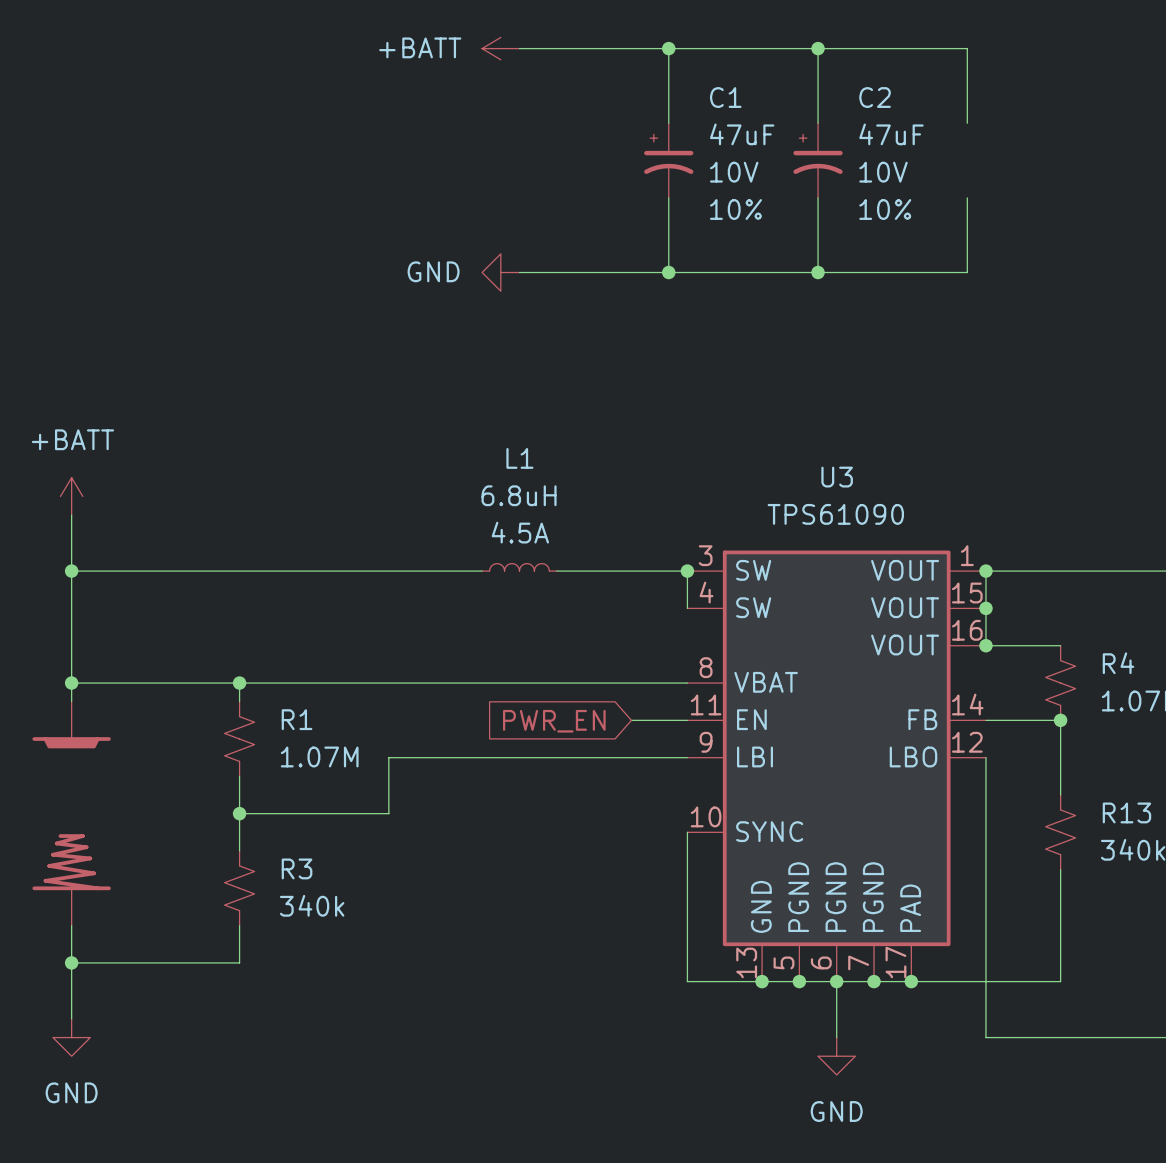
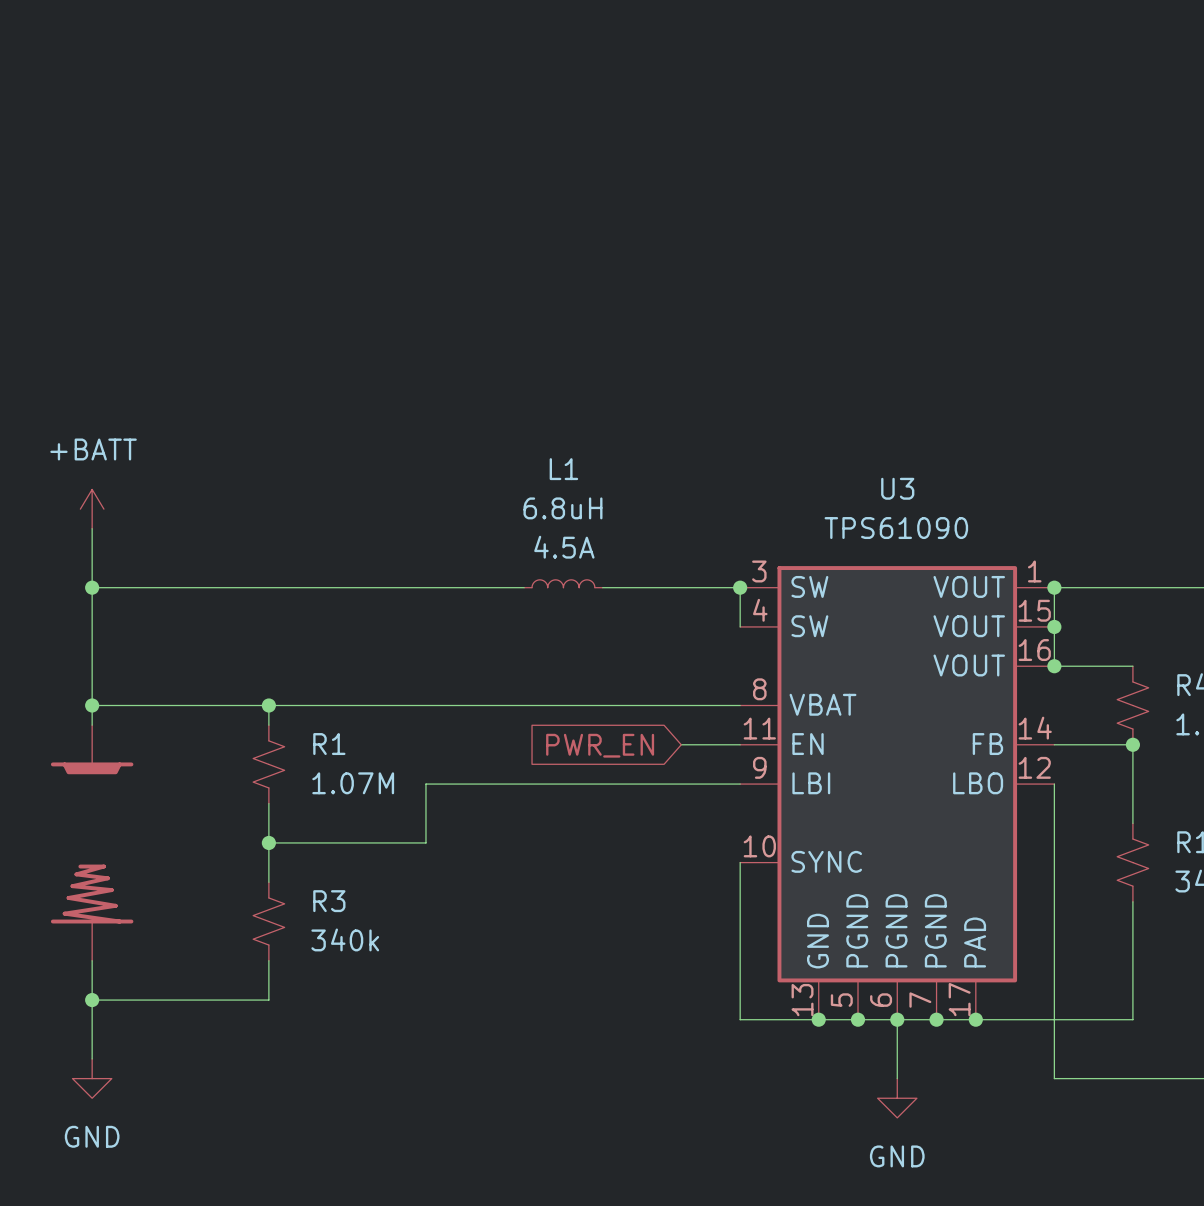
power symbol: +BATT (500, 48) -> none
wire: (519, 48) (967, 48) (967, 123) -> none
wire: (668, 48) (668, 123) -> none
junction: (668, 48) -> none
wire: (818, 48) (818, 123) -> none
junction: (818, 48) -> none
C1: 47uF (668, 160) -> none
C2: 47uF (818, 160) -> none
wire: (668, 197) (668, 272) -> none
wire: (818, 197) (818, 272) -> none
wire: (967, 197) (967, 272) (519, 272) -> none
power symbol: GND (500, 272) -> none
junction: (668, 272) -> none
junction: (818, 272) -> none

